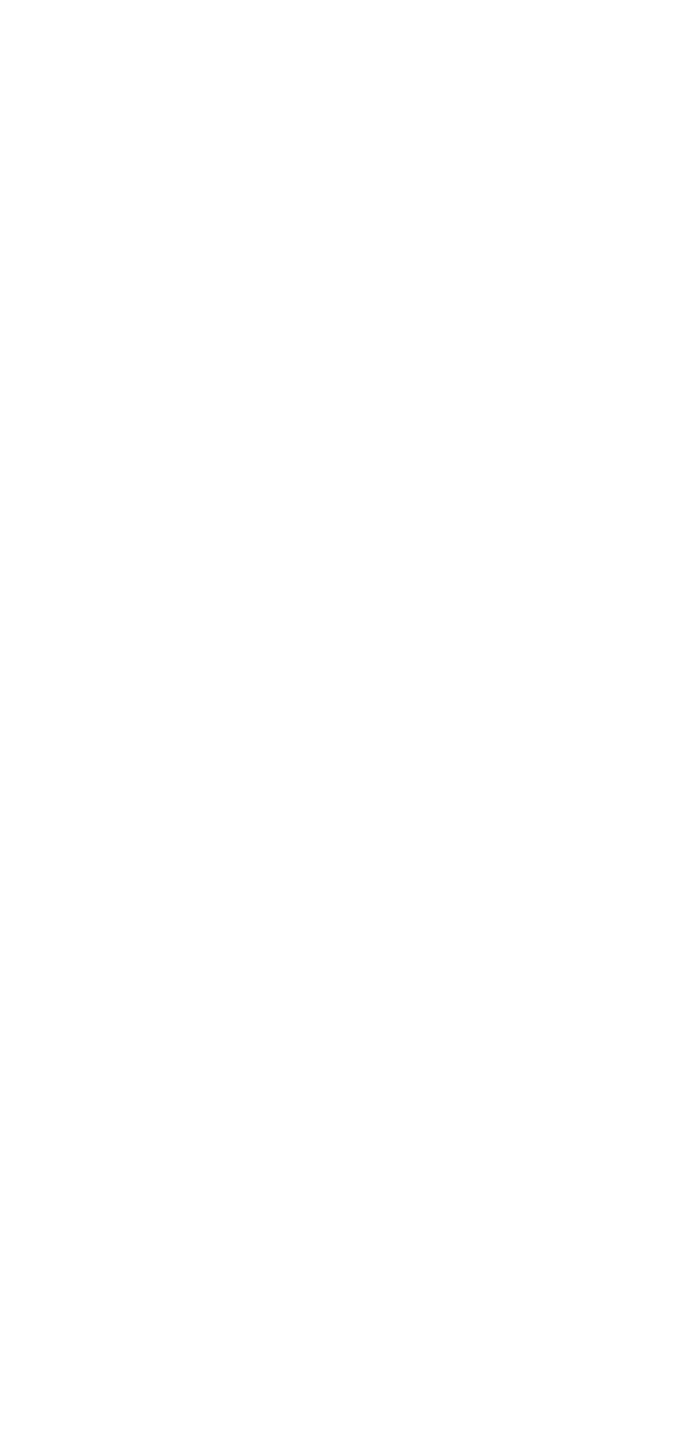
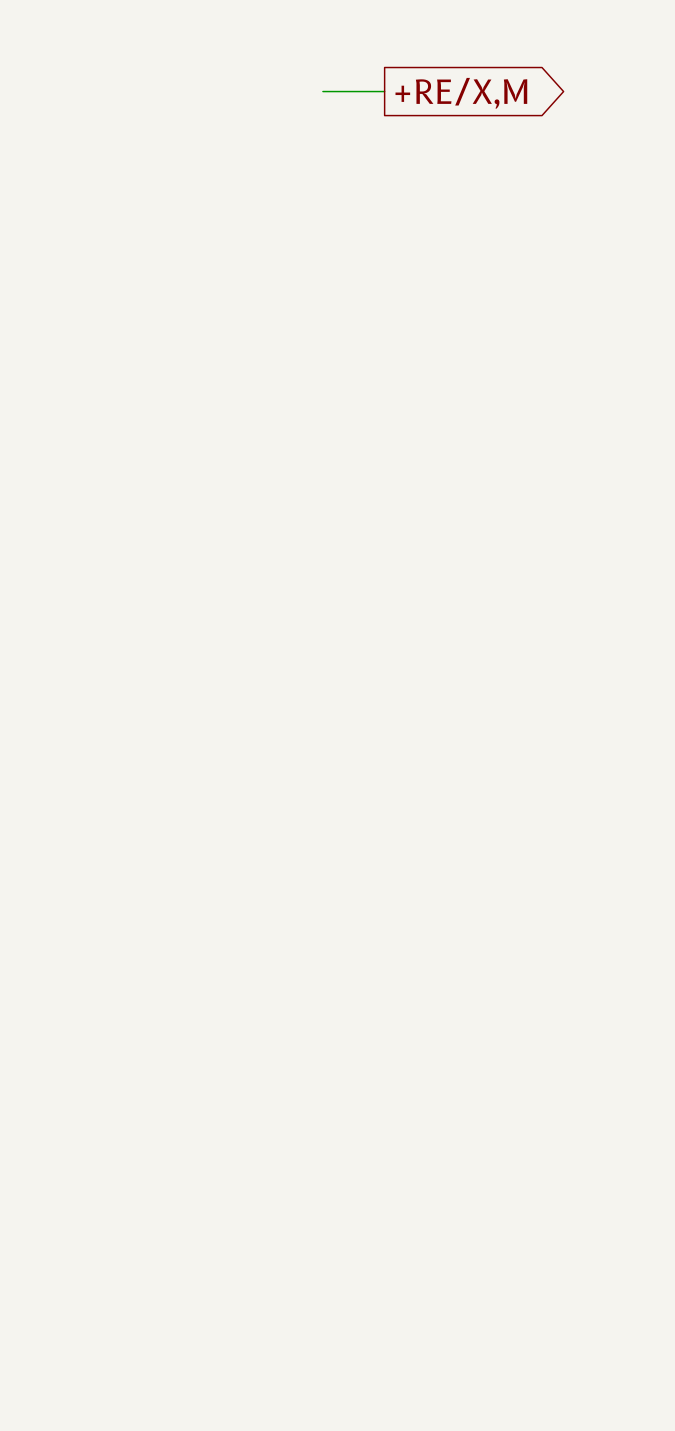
wire: none -> (322, 91) (384, 91)
global label: none -> +RE/X,M (461, 93)

